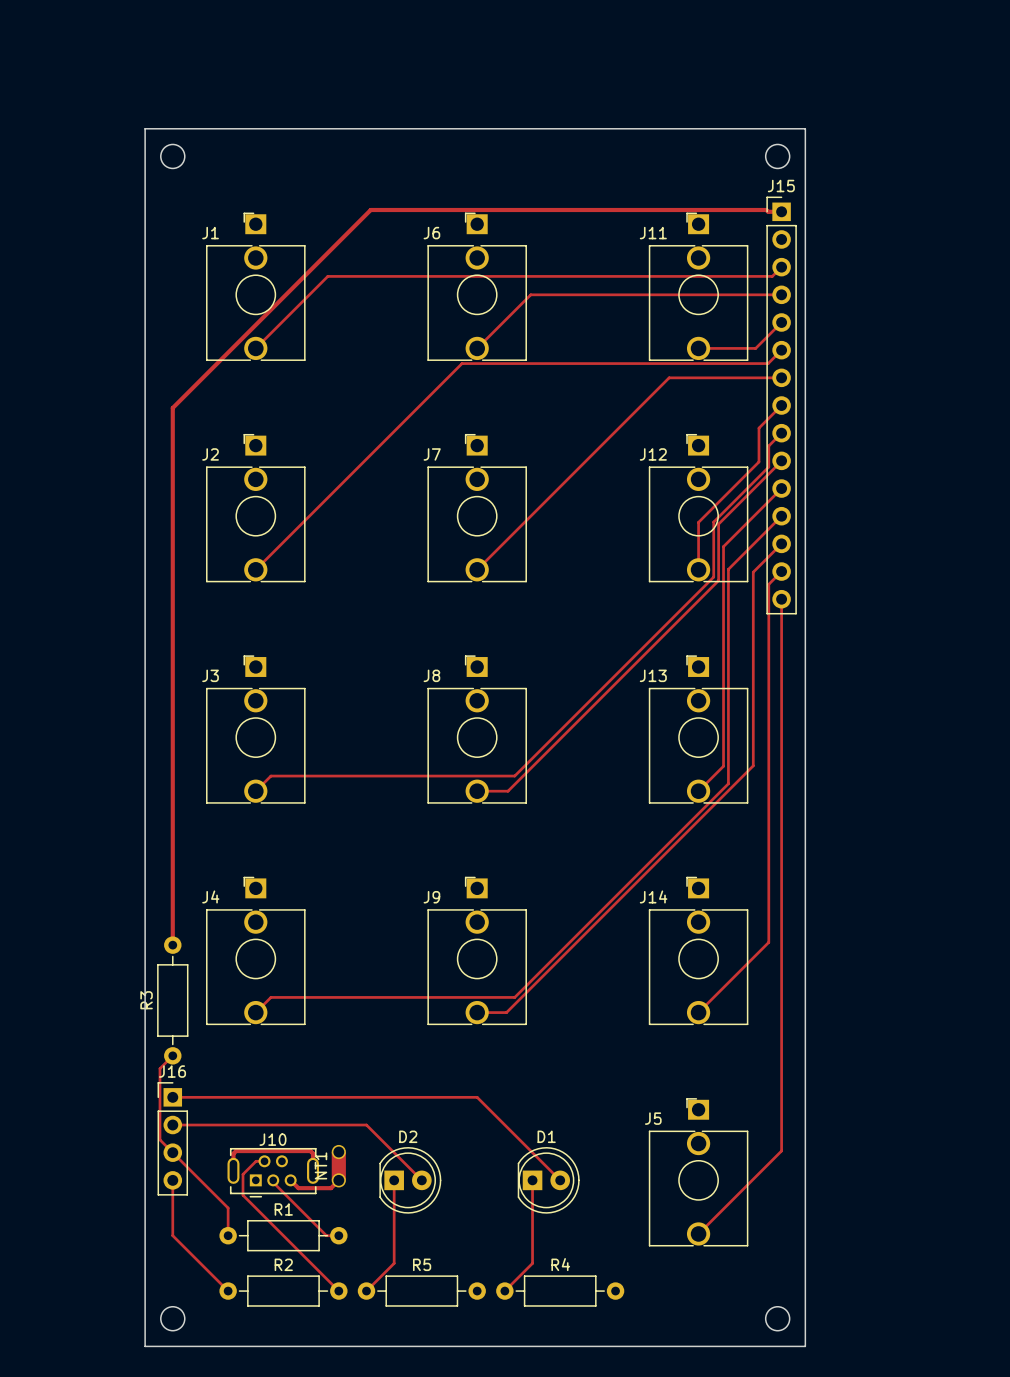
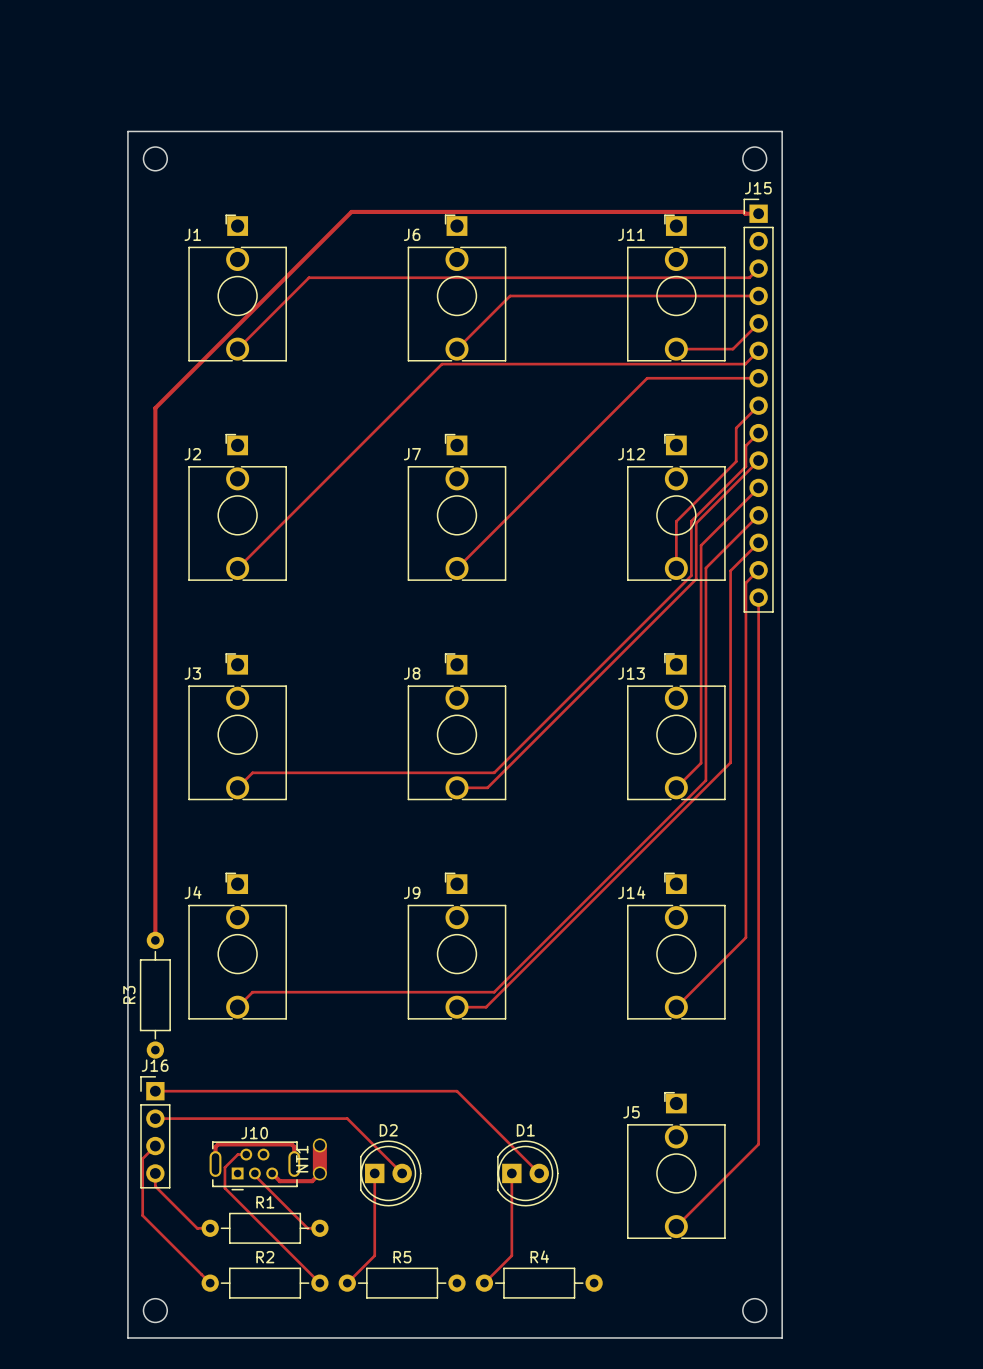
track: (172, 1055) (159, 1068) (159, 1139) (228, 1208) (228, 1235) -> (155, 1186) (197, 1228) (210, 1228)
track: (172, 1193) (172, 1235) -> (155, 1146) (142, 1158) (142, 1215) (155, 1228)

